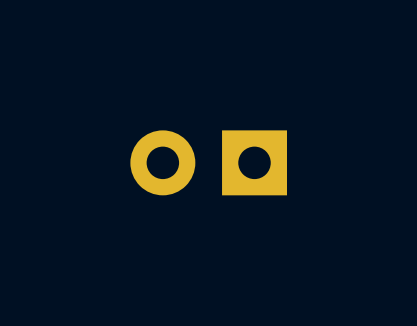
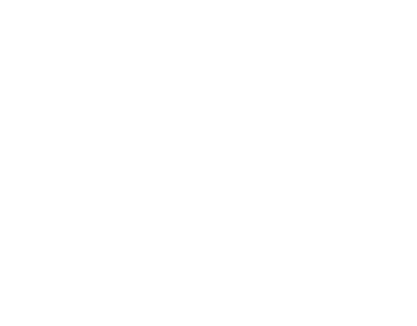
part: (208, 162) -> none

